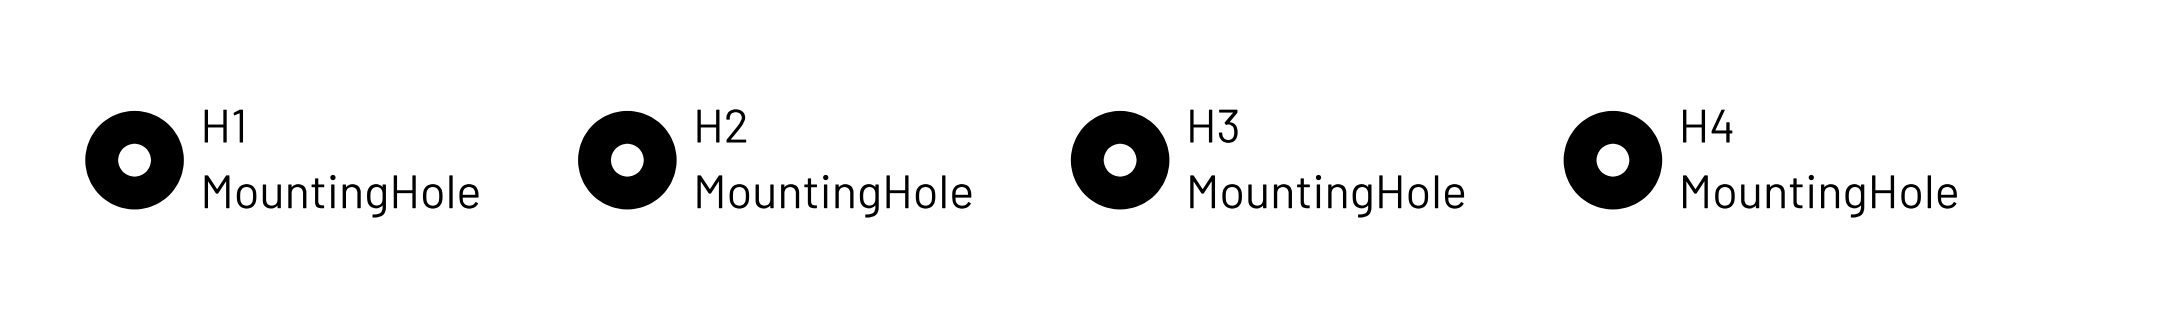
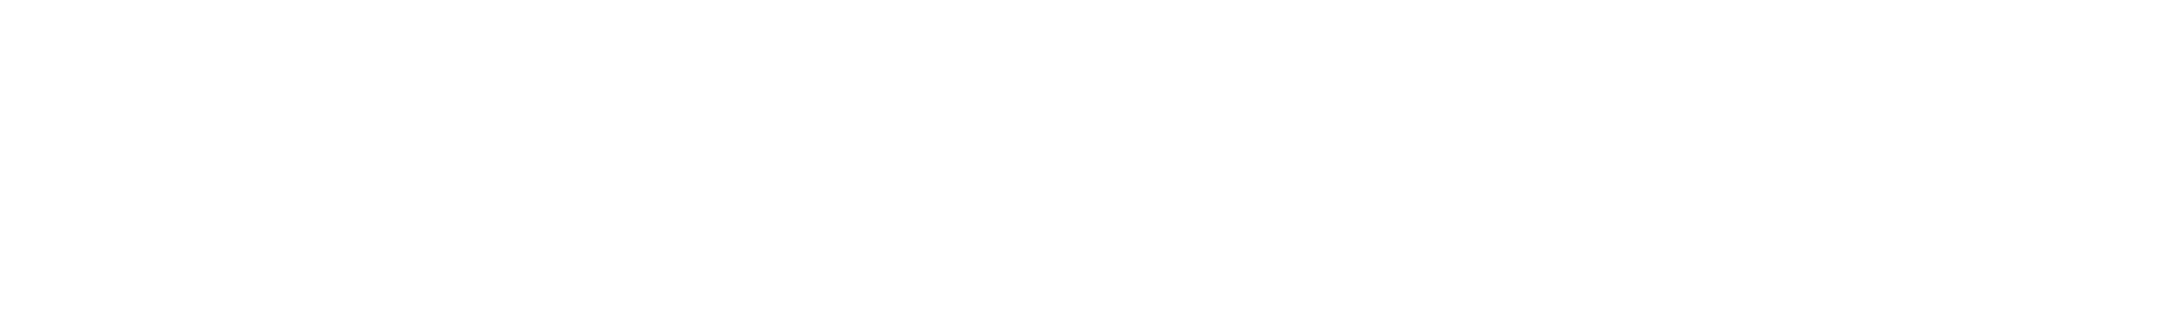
H1: MountingHole (134, 160) -> none
H2: MountingHole (627, 160) -> none
H3: MountingHole (1120, 160) -> none
H4: MountingHole (1612, 160) -> none

